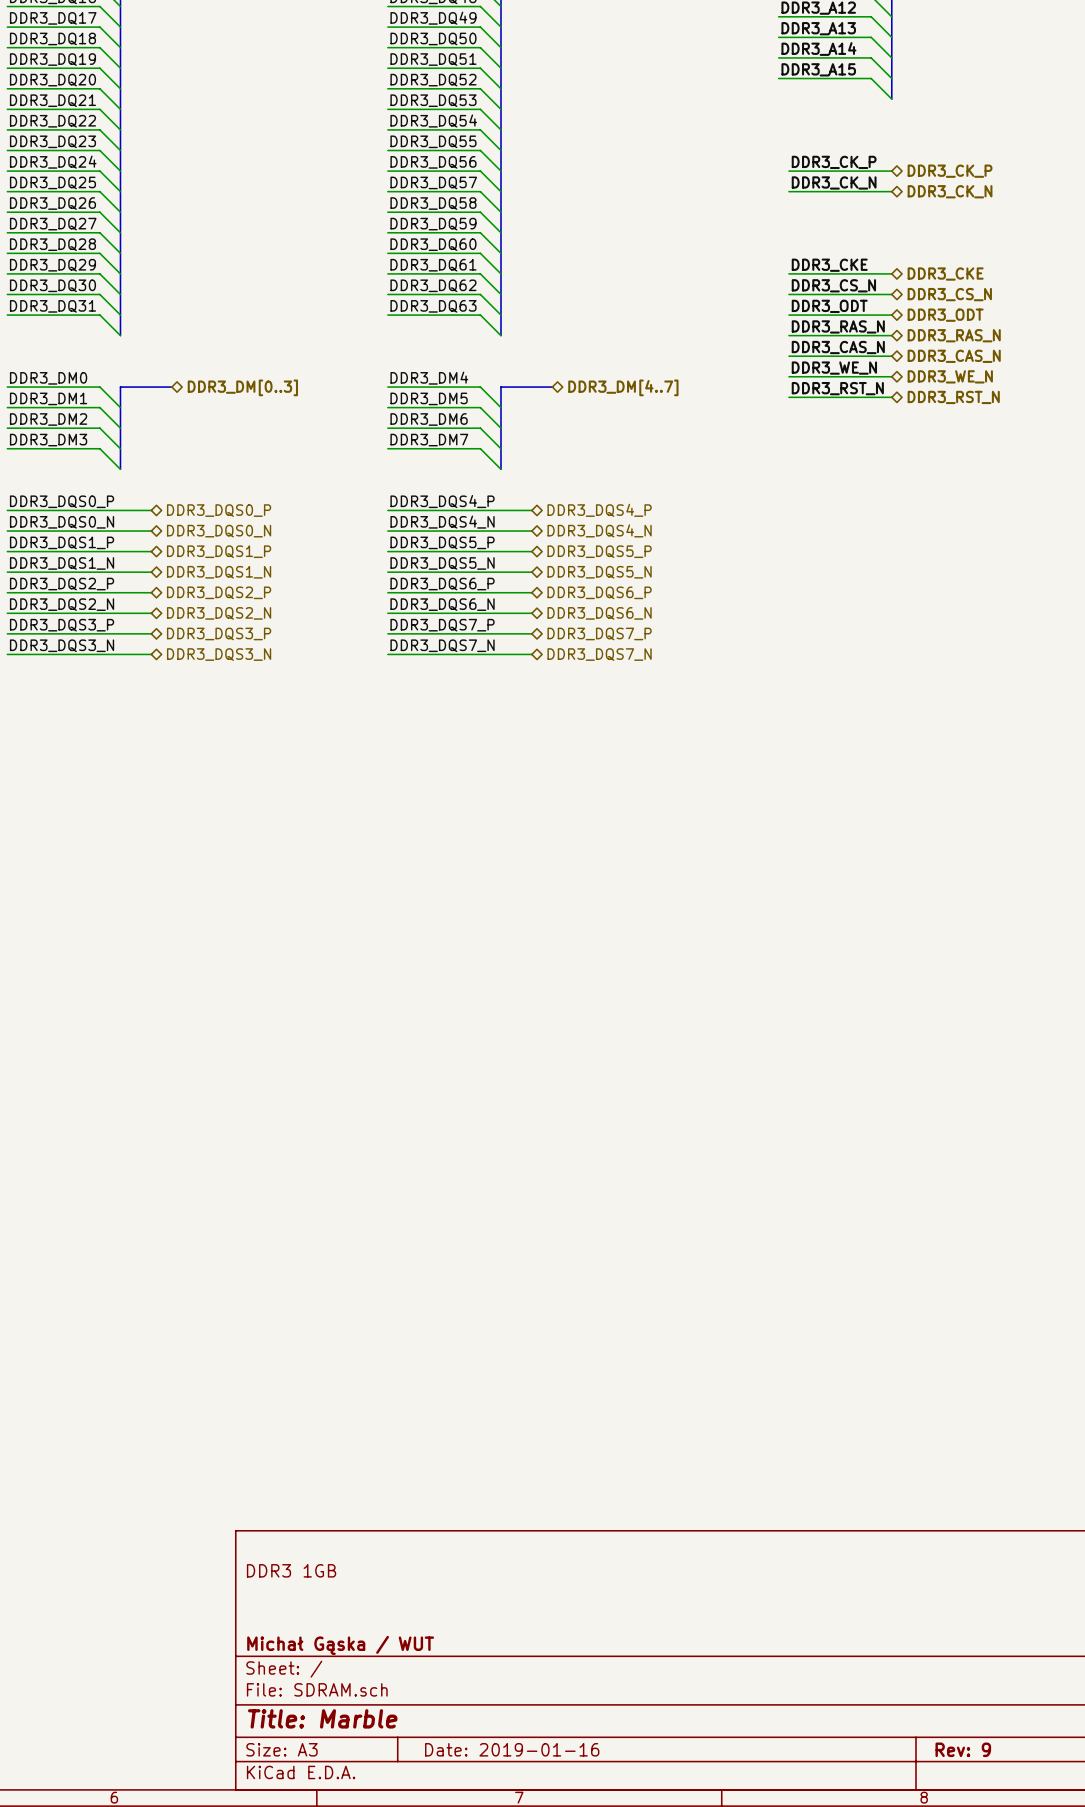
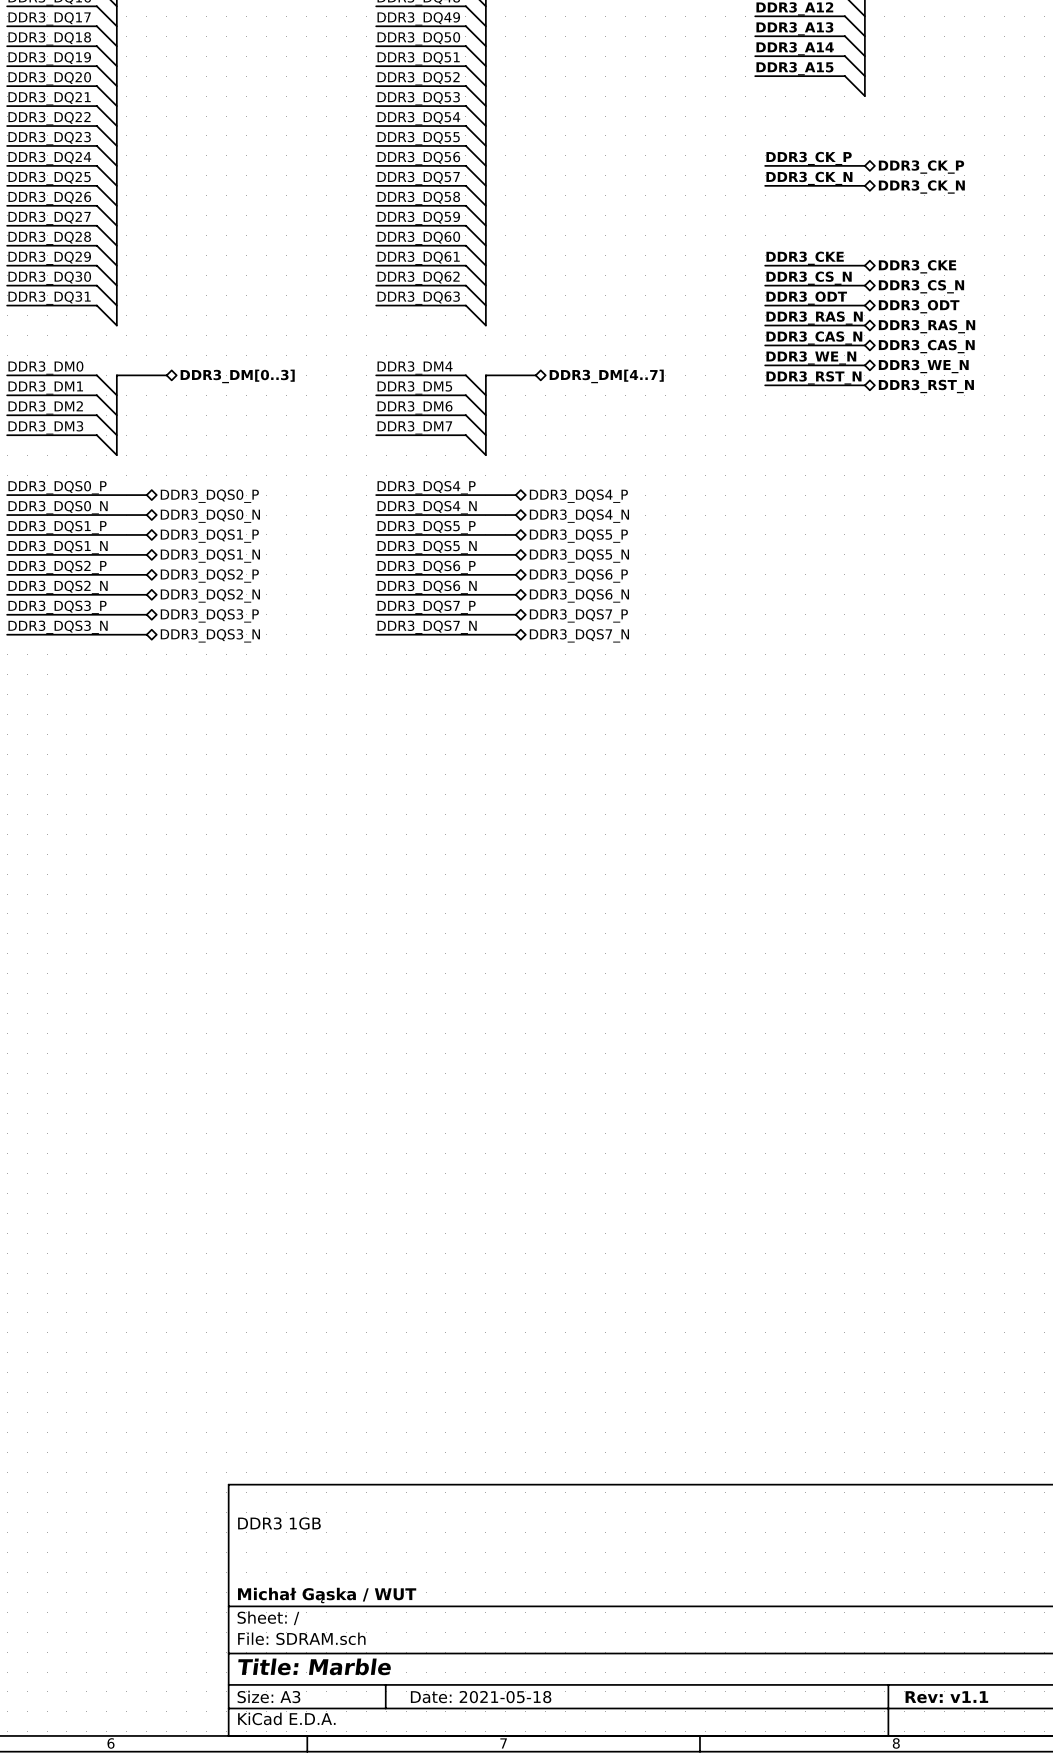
title block: Date: 2019-01-16 (512, 1749) -> Date: 2021-05-18 (481, 1697)
title block: Rev: 9 (963, 1749) -> Rev: v1.1 (946, 1697)

